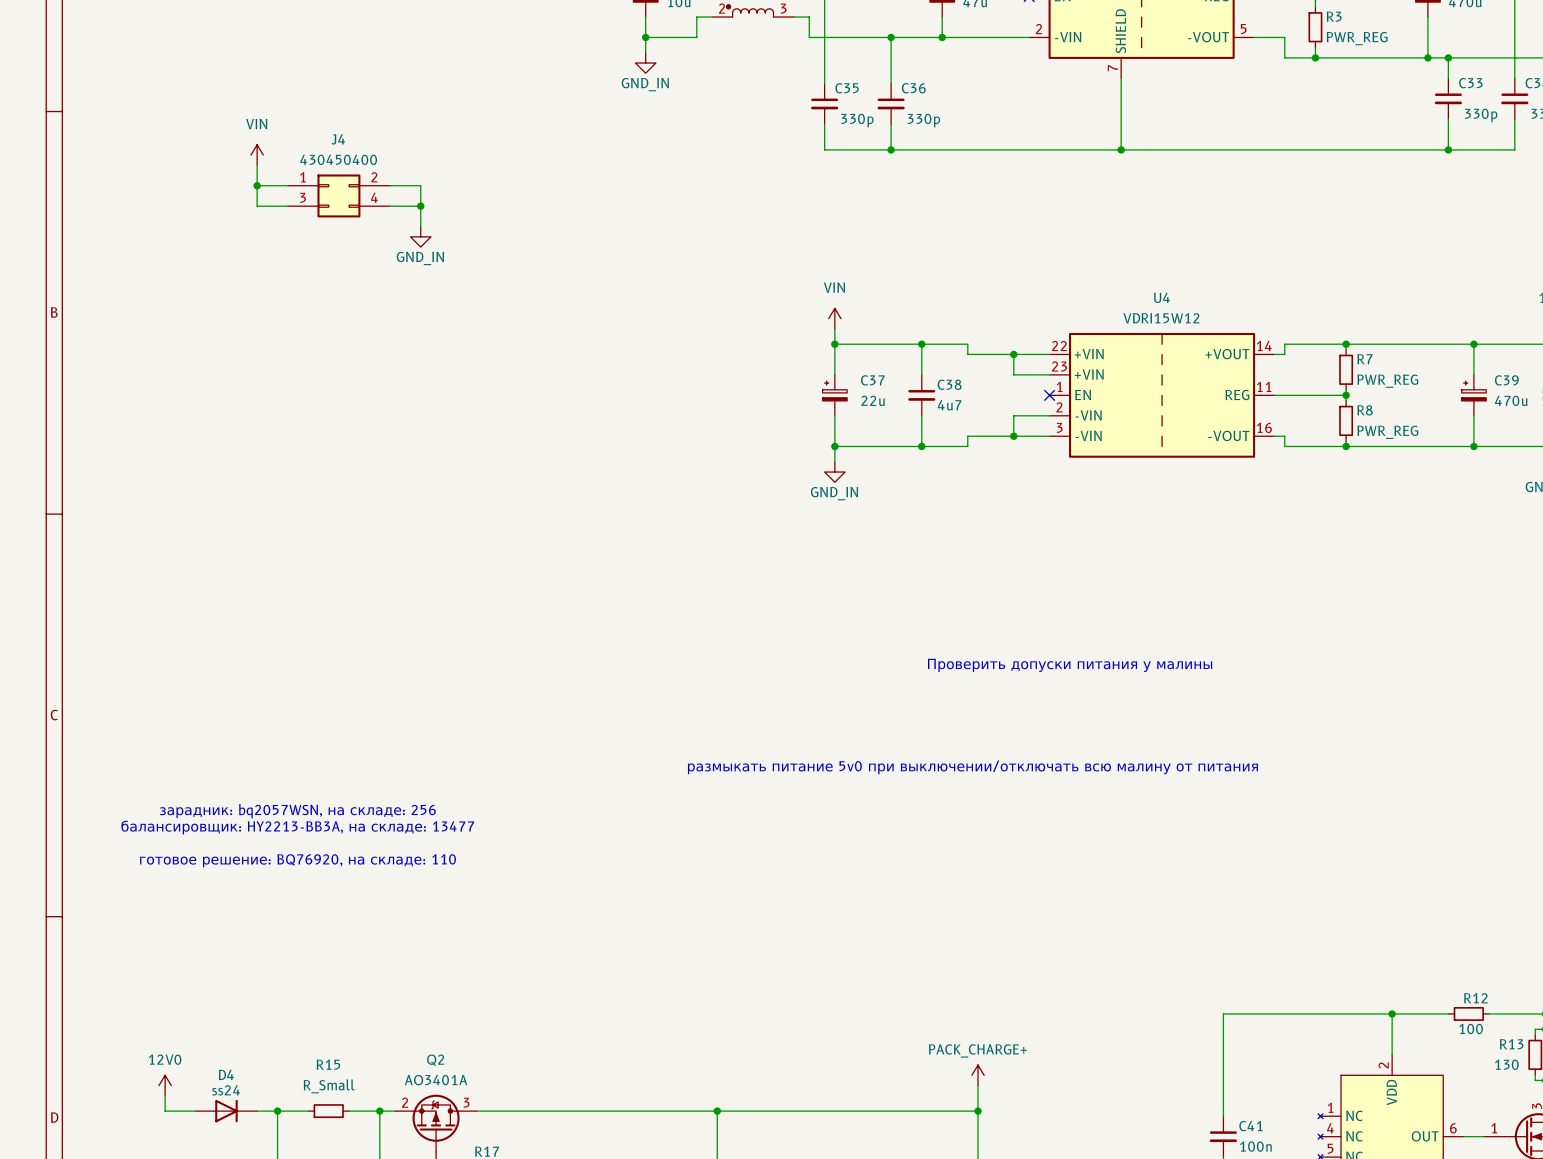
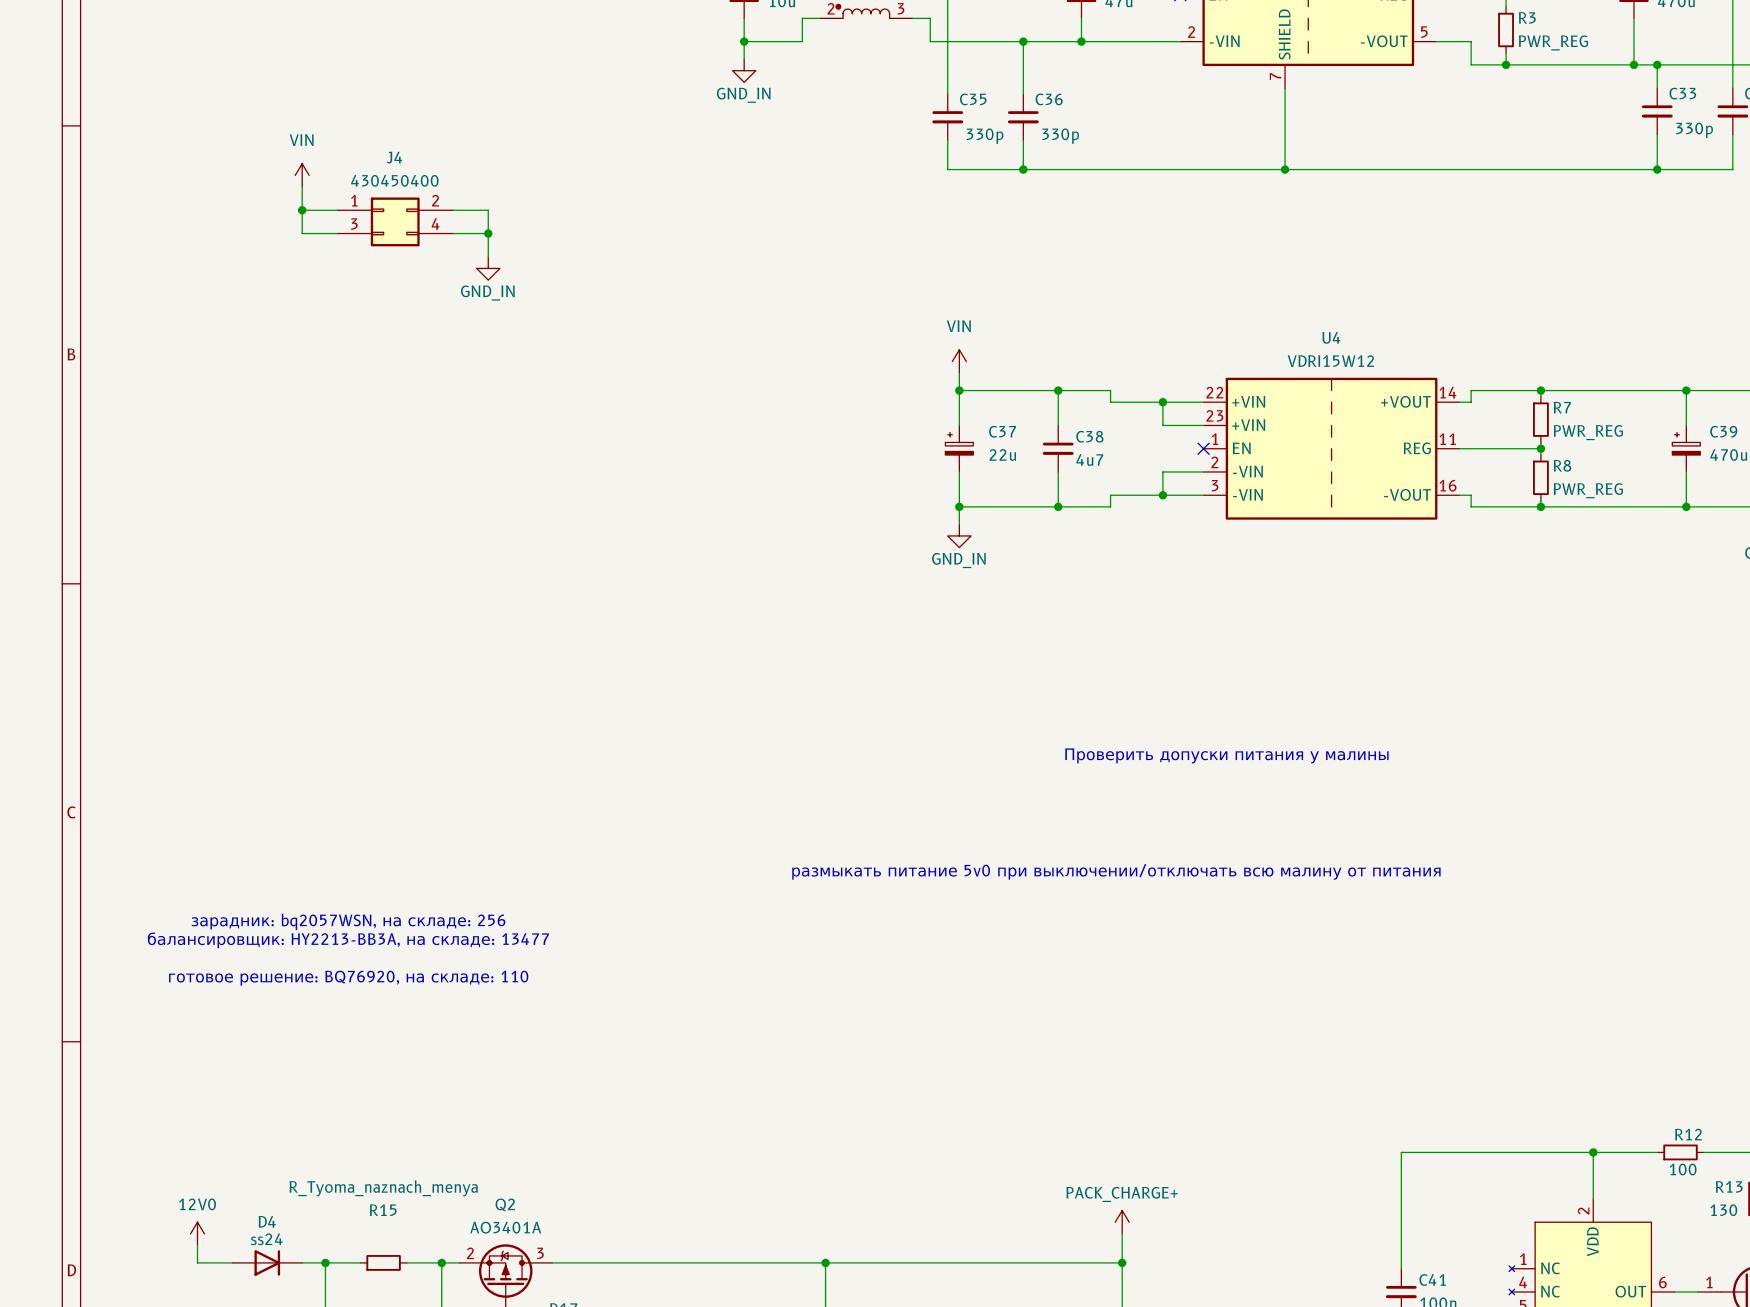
R15 value: R_Small (329, 1086) -> R_Tyoma_naznach_menya (383, 1188)

